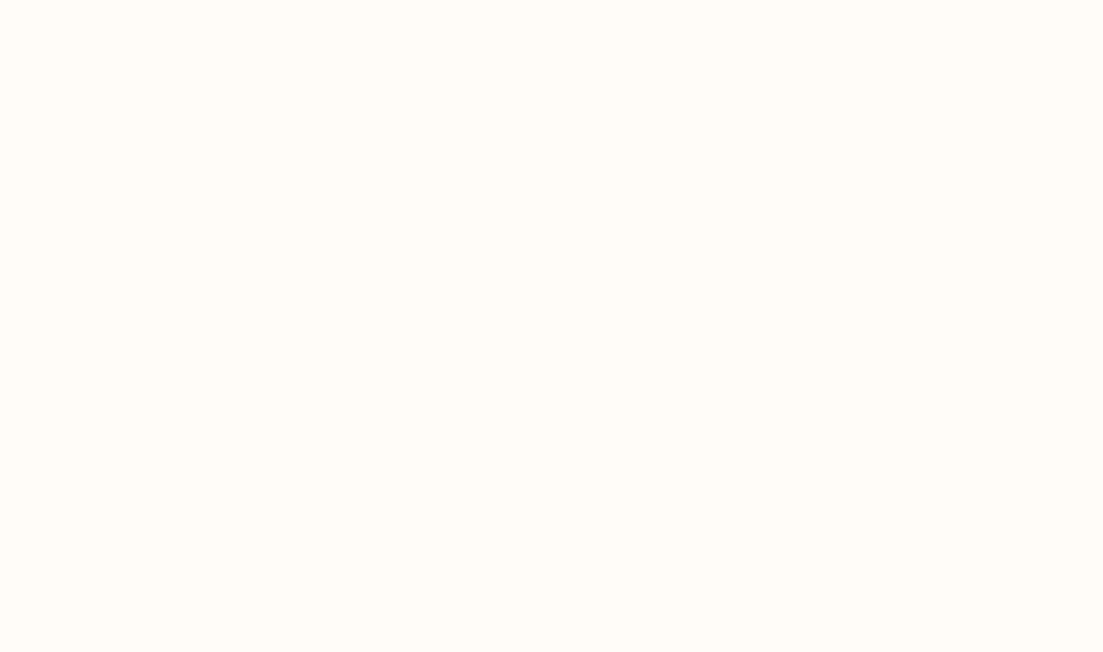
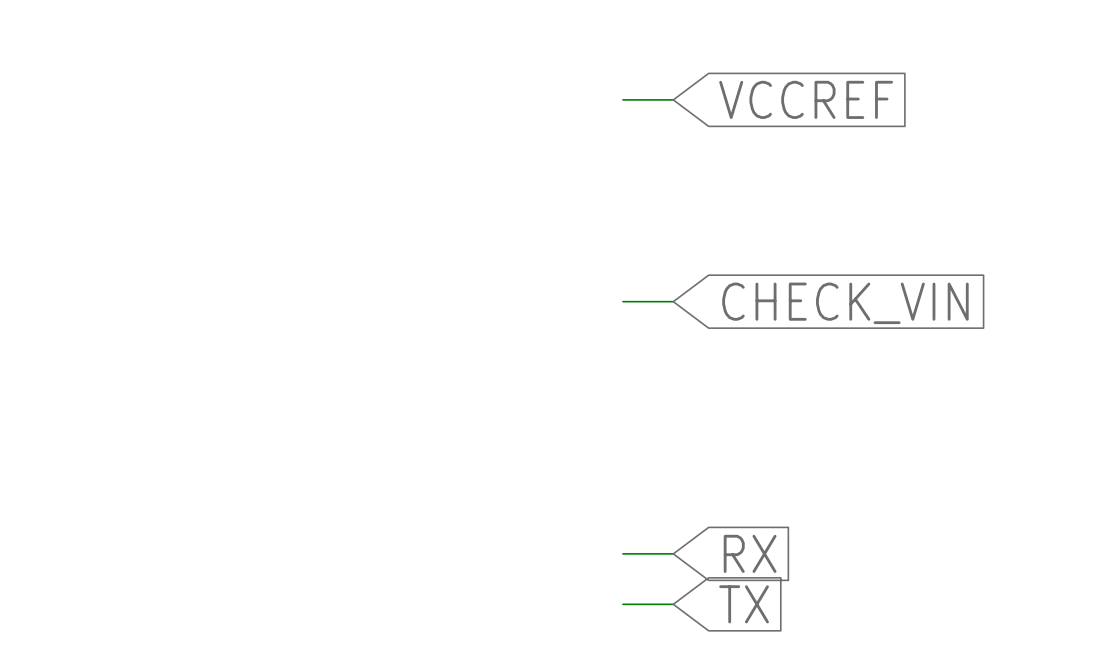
wire: none -> (622, 99) (673, 99)
global label: none -> VCCREF (806, 99)
wire: none -> (622, 301) (673, 301)
global label: none -> CHECK_VIN (845, 303)
wire: none -> (622, 553) (673, 553)
global label: none -> RX (750, 553)
wire: none -> (622, 604) (673, 604)
global label: none -> TX (744, 604)

